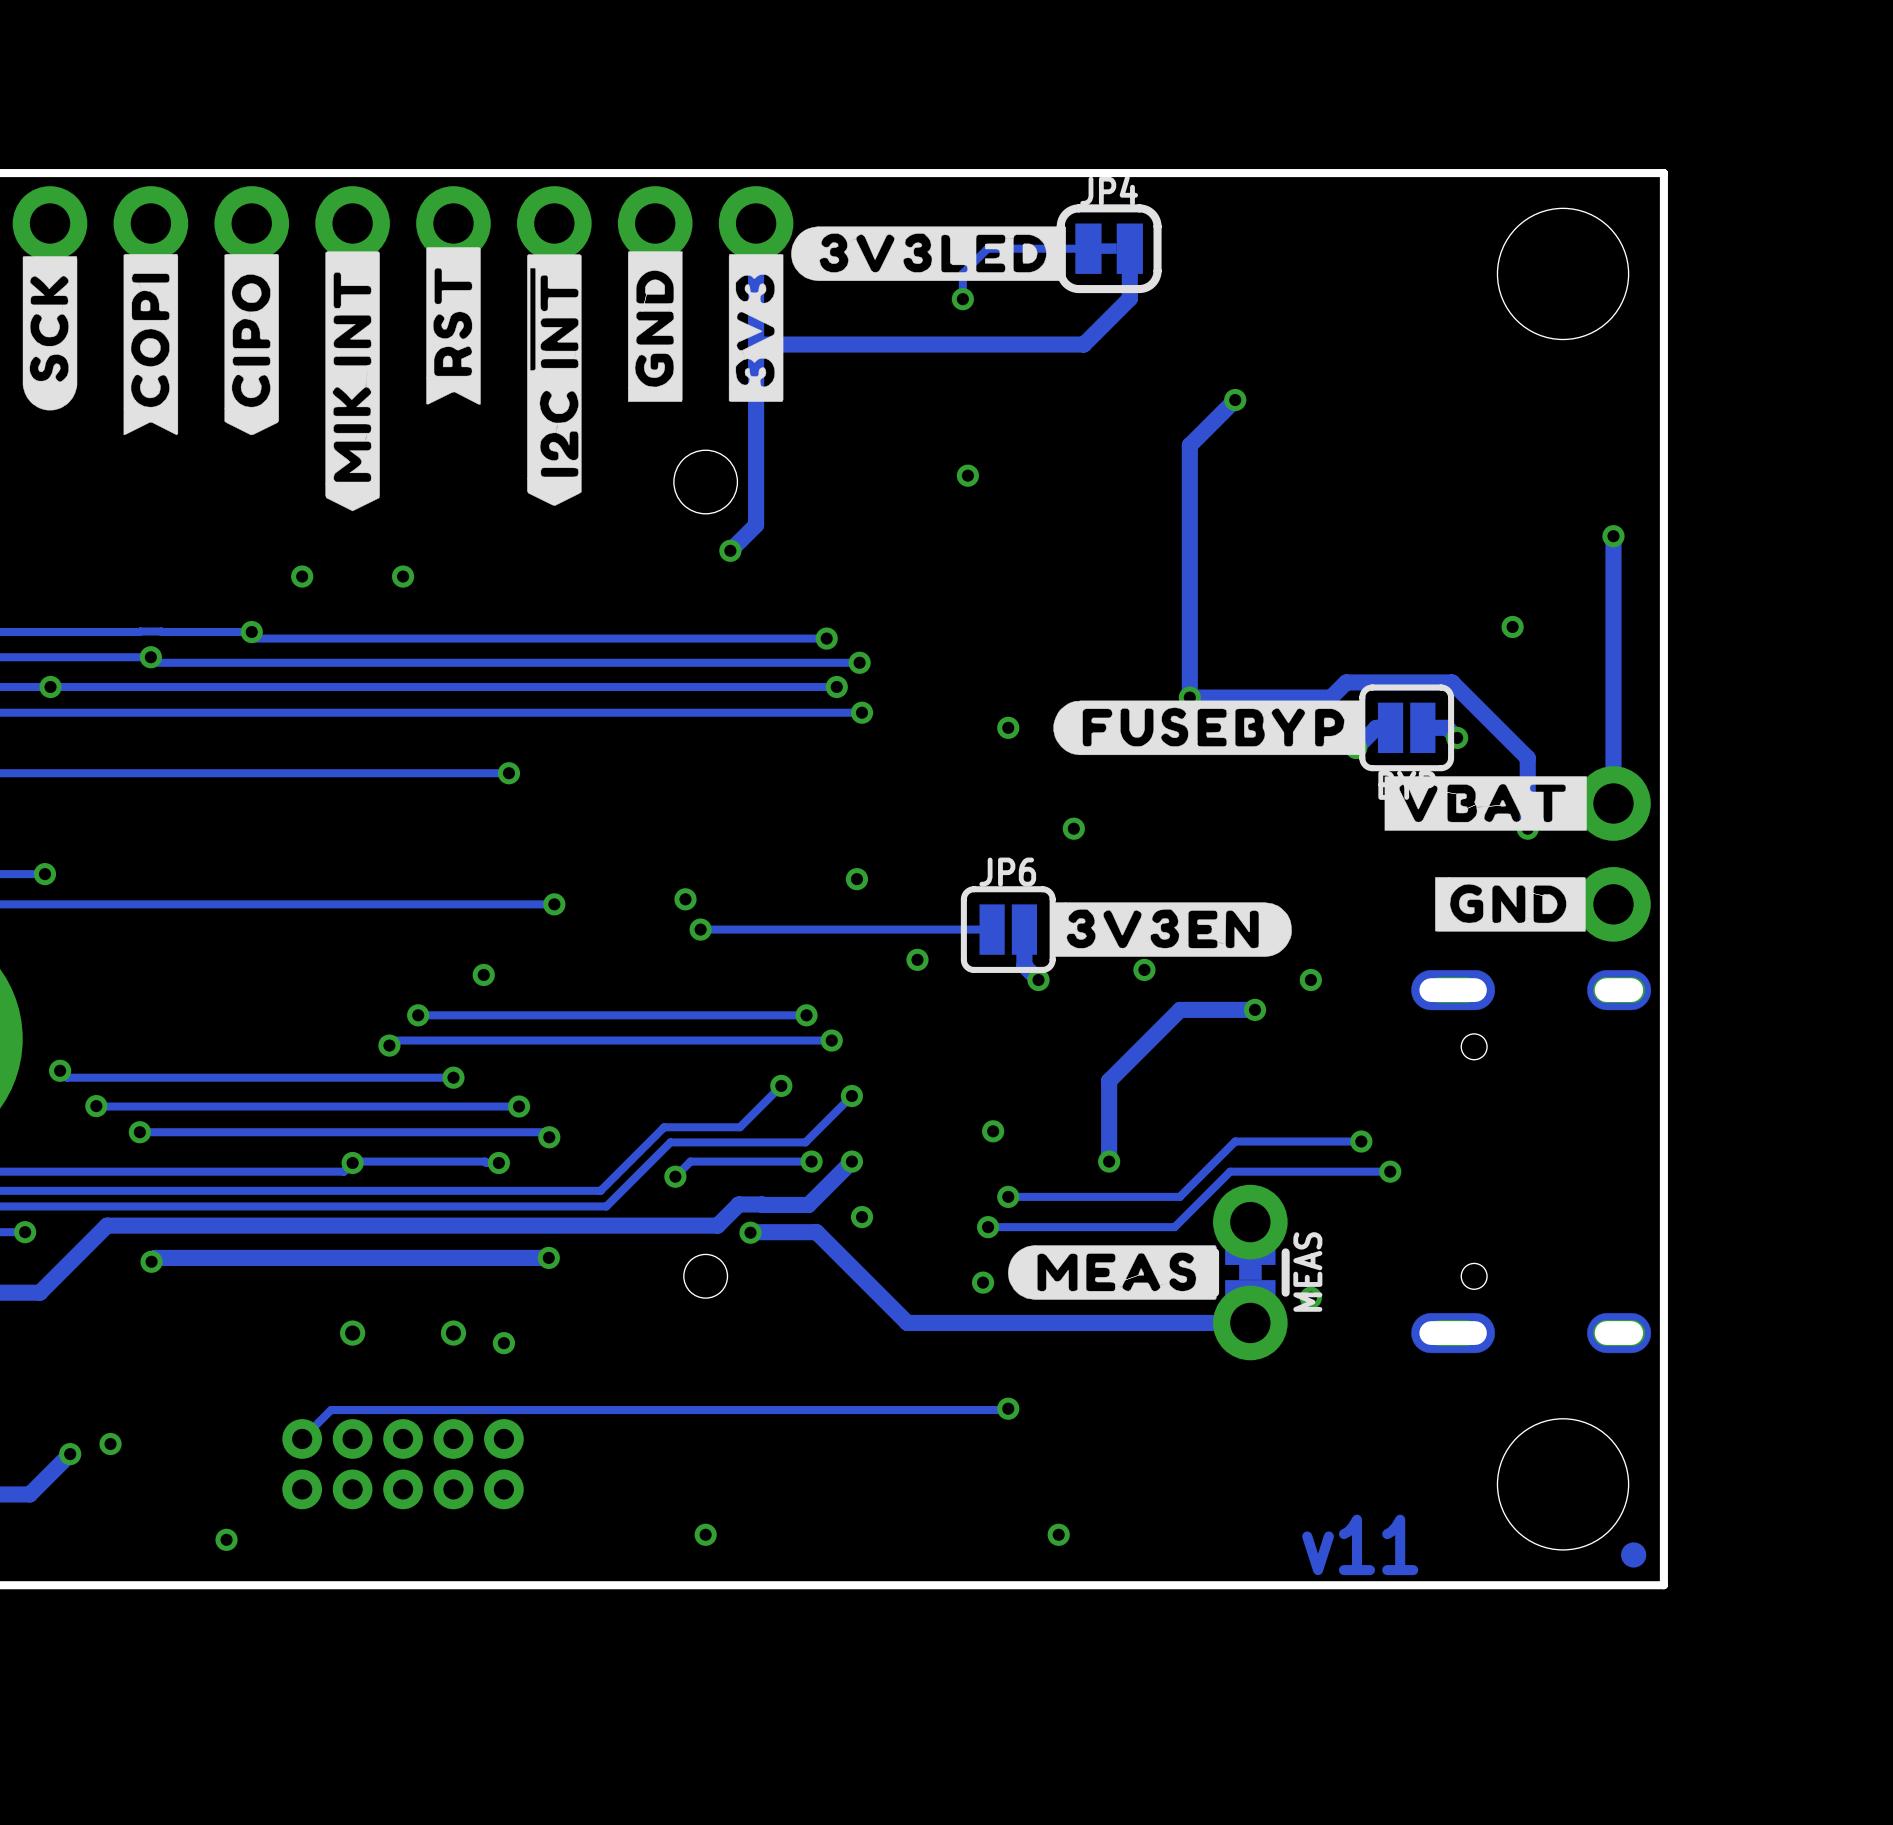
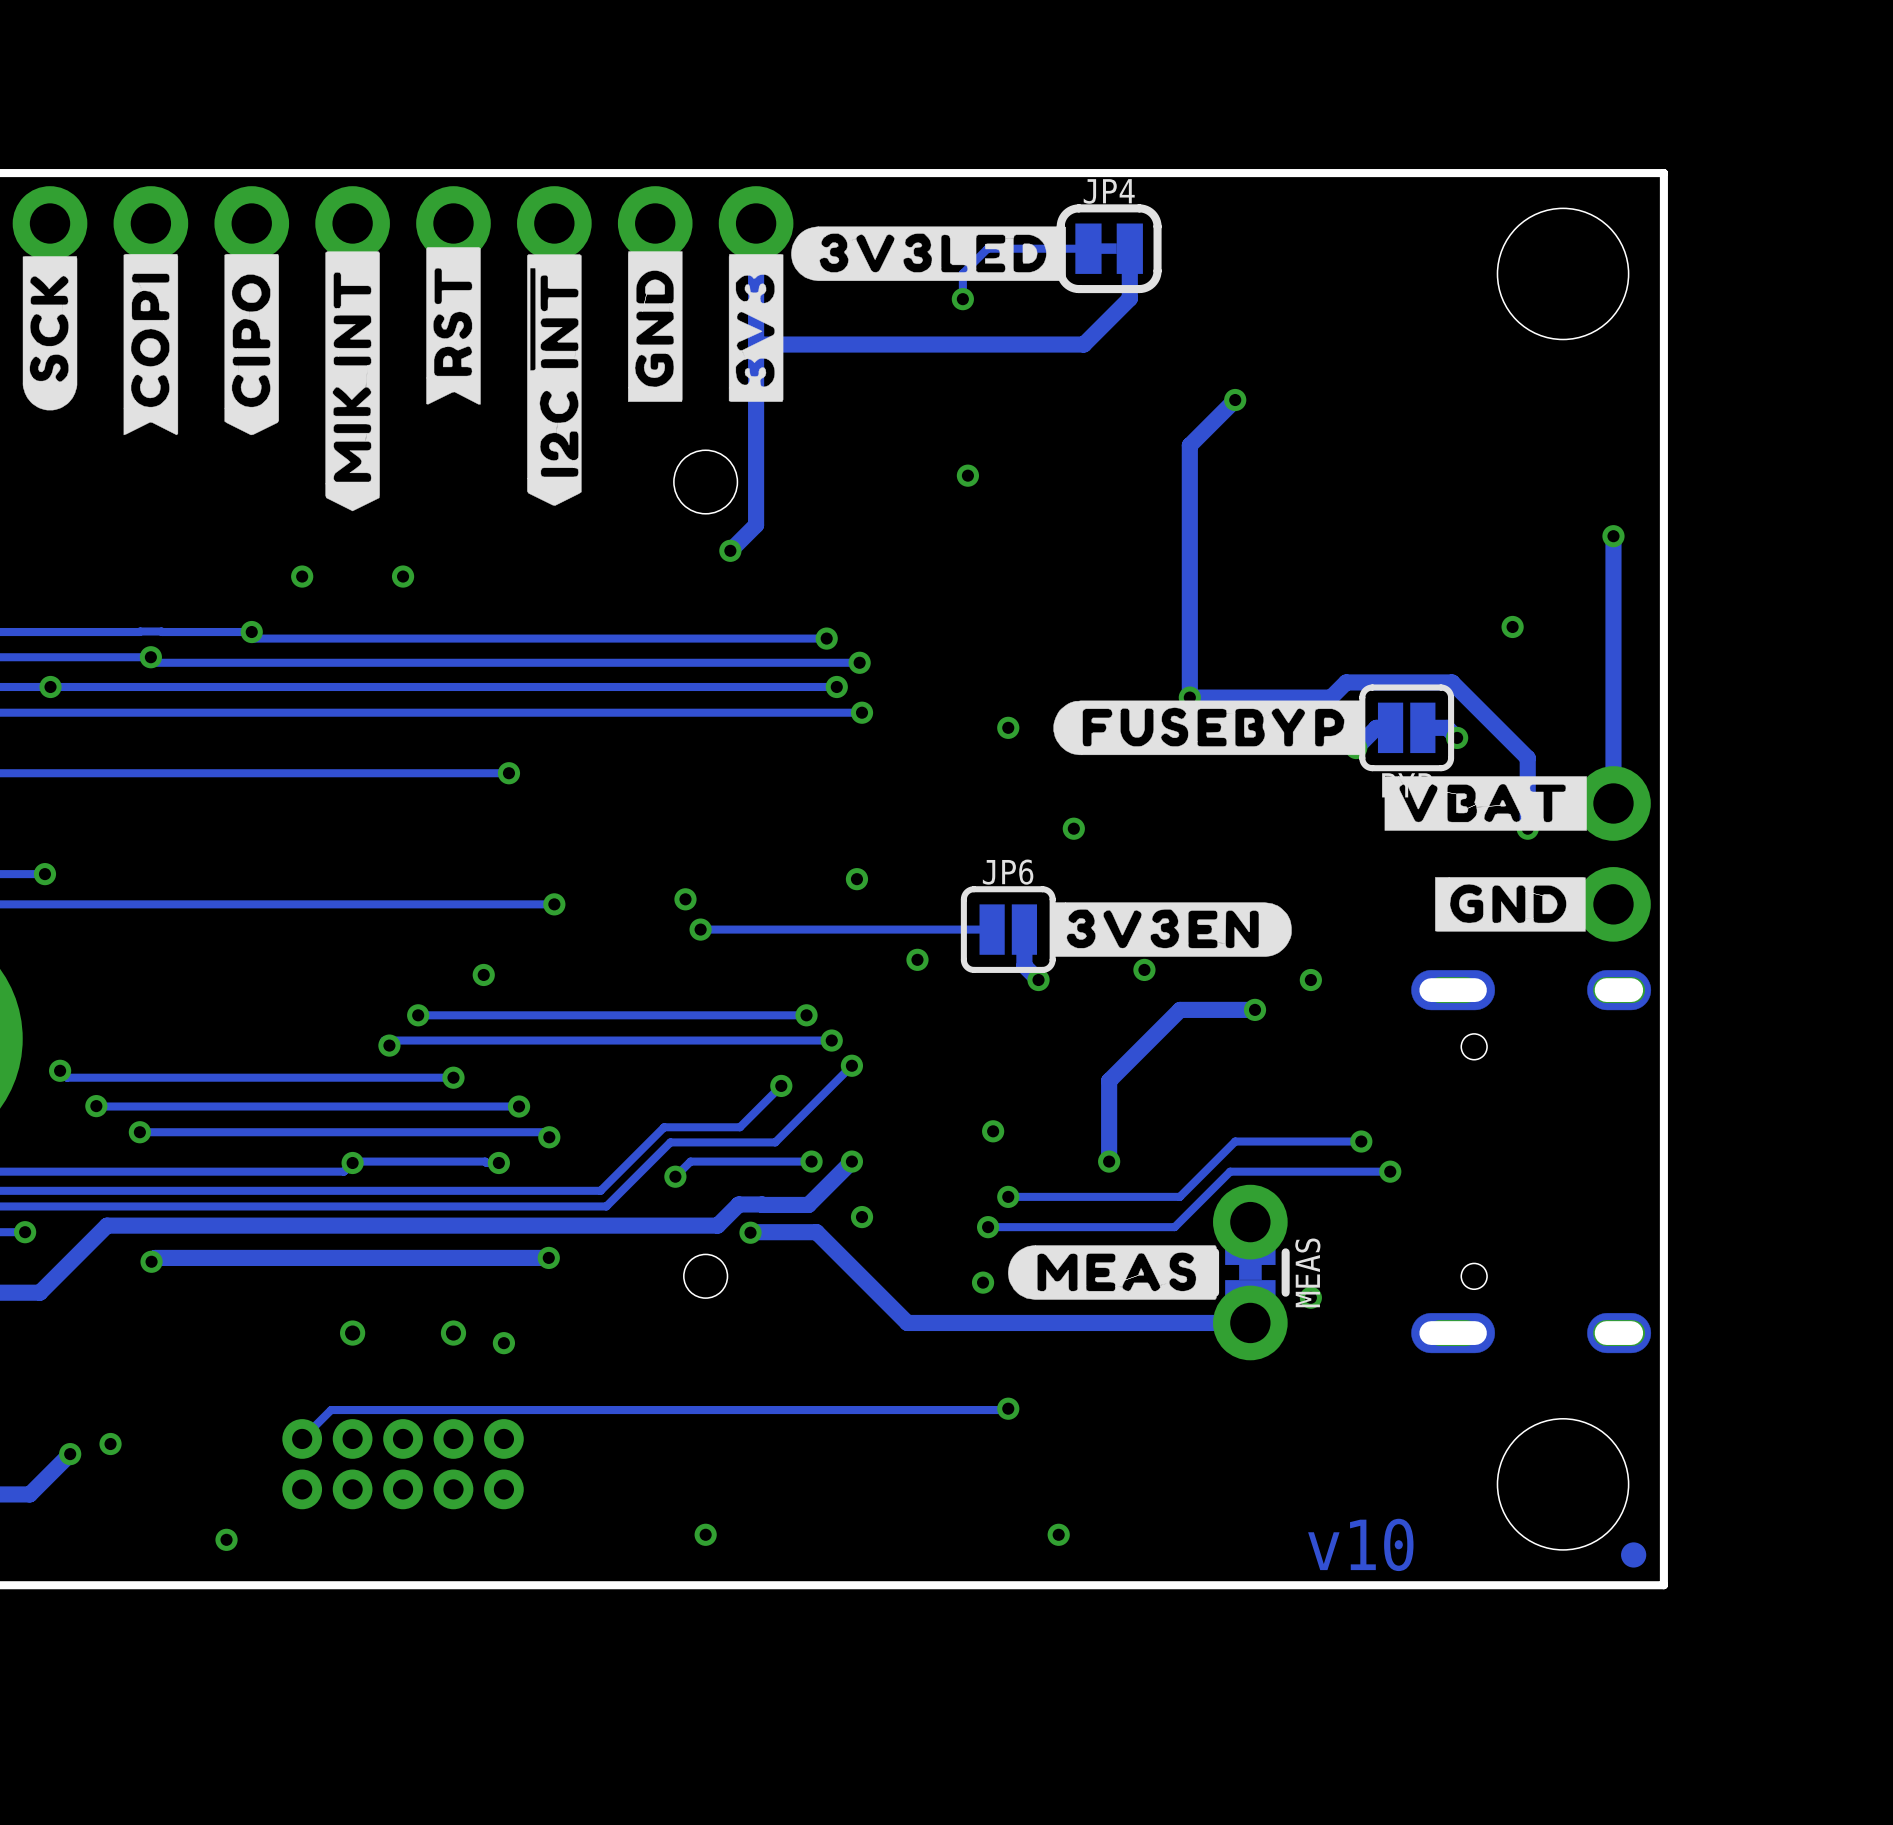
track: (851, 1096) (805, 1142) (775, 1142) -> (851, 1065) (775, 1142)
via position: (851, 1096) -> (851, 1065)
text: v11 (1360, 1544) -> v10 (1360, 1544)

